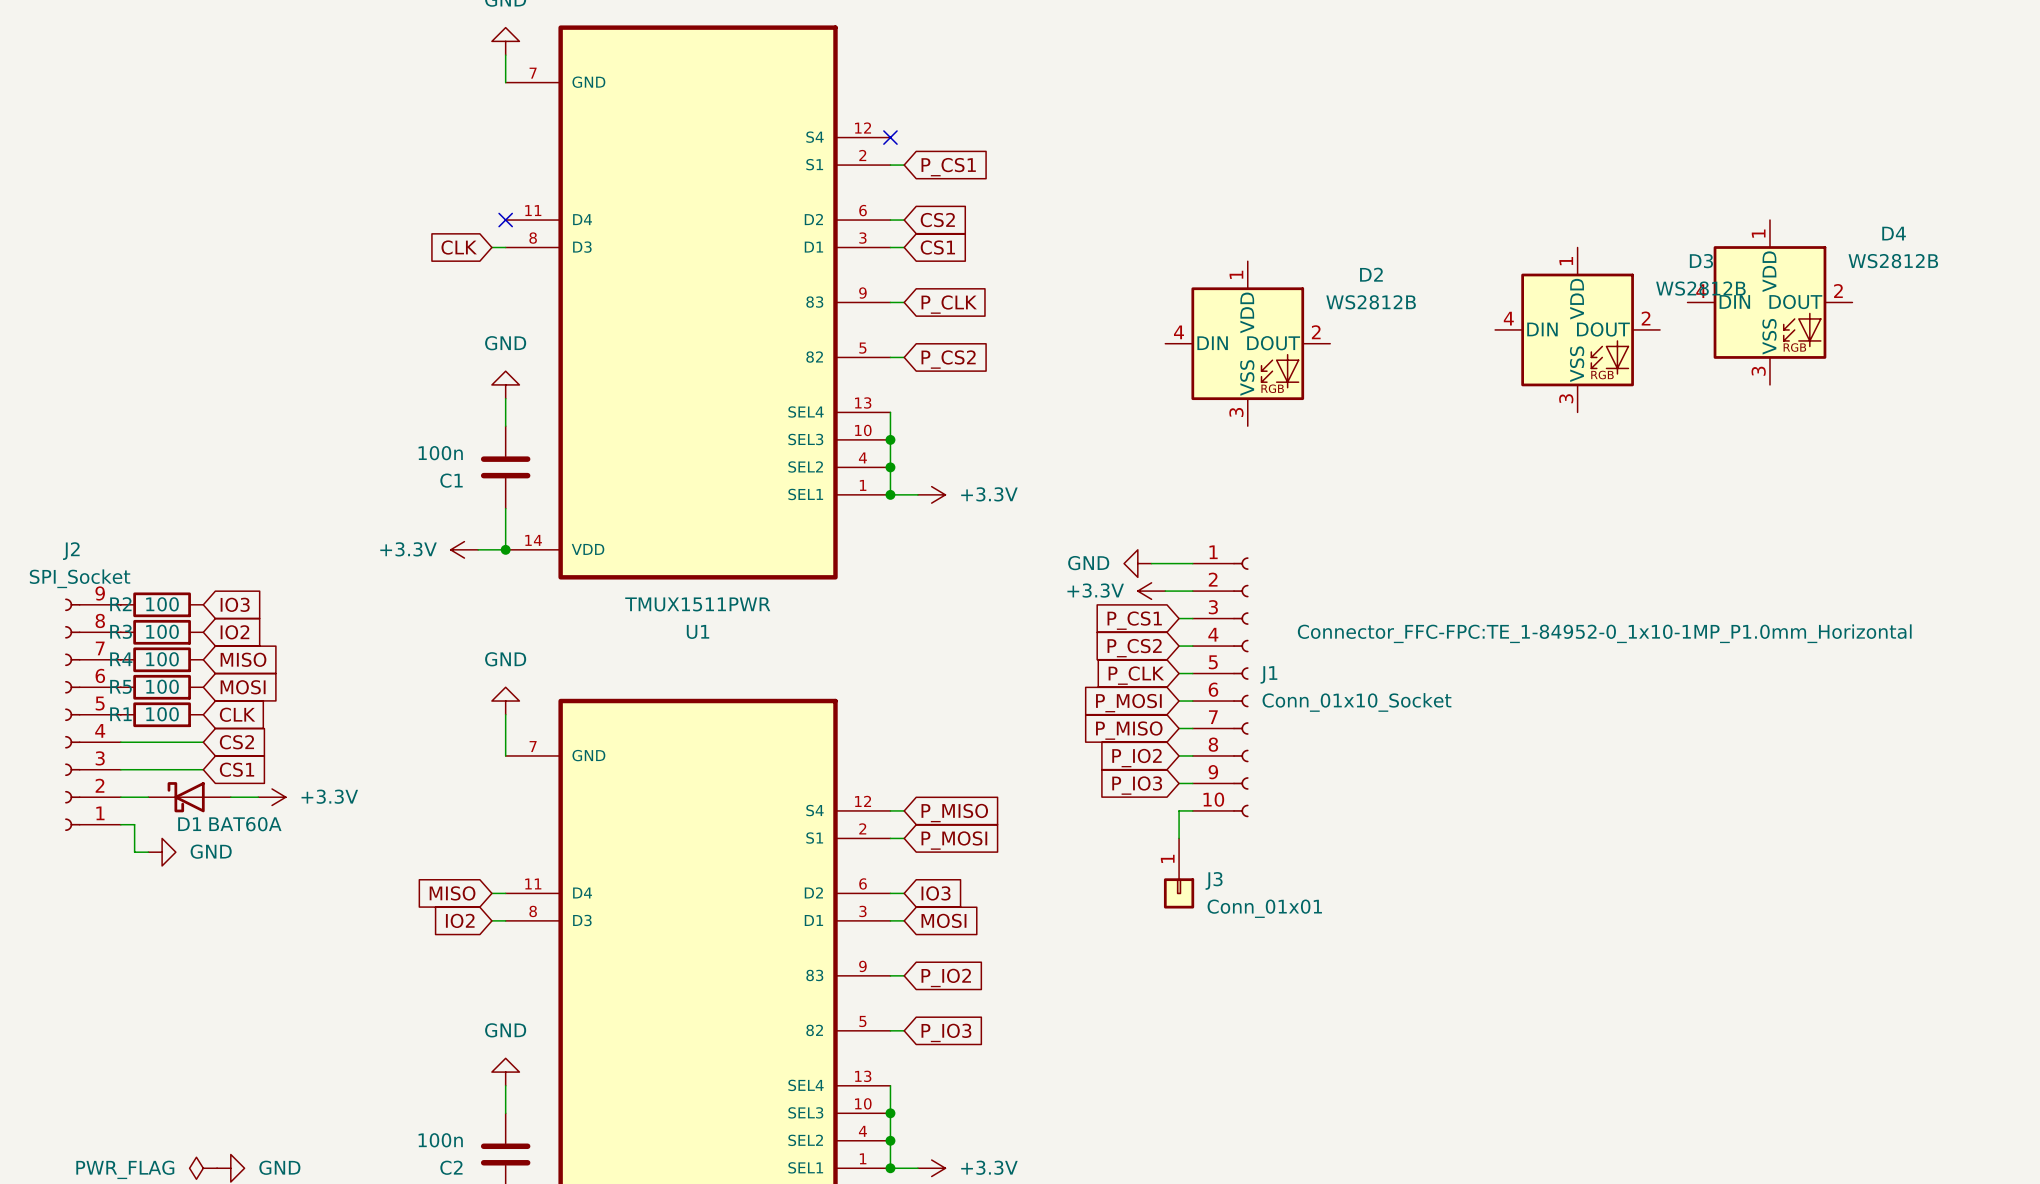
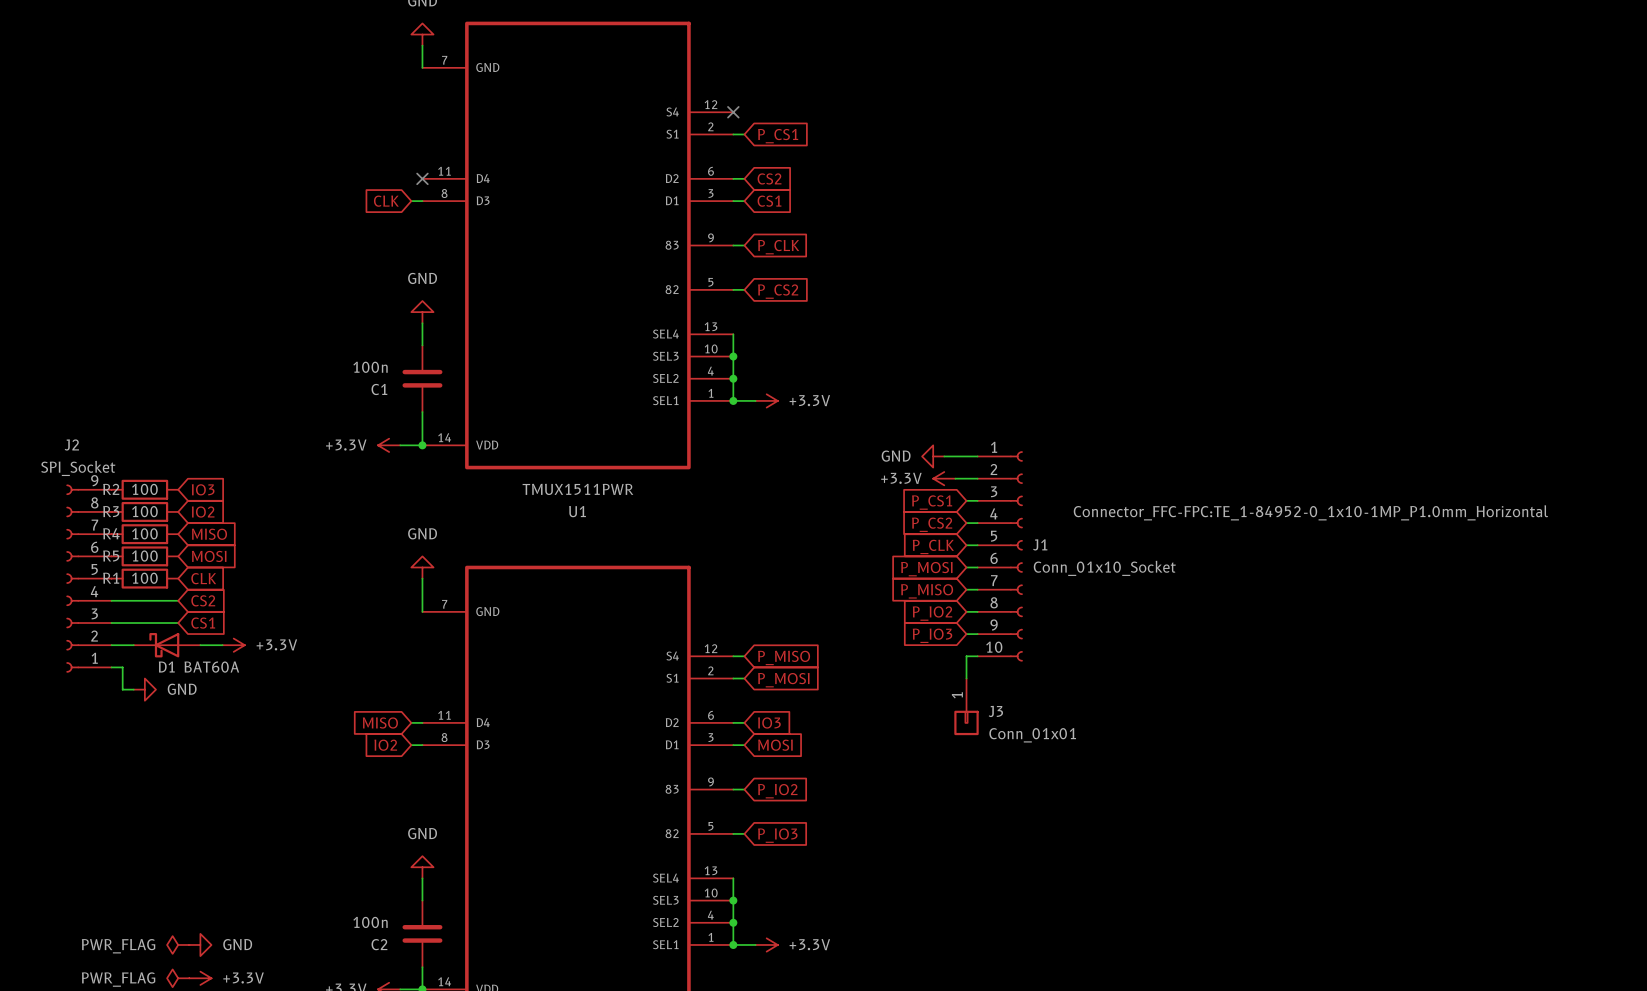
D4: WS2812B (1769, 302) -> none
D3: WS2812B (1577, 329) -> none
D2: WS2812B (1247, 343) -> none

